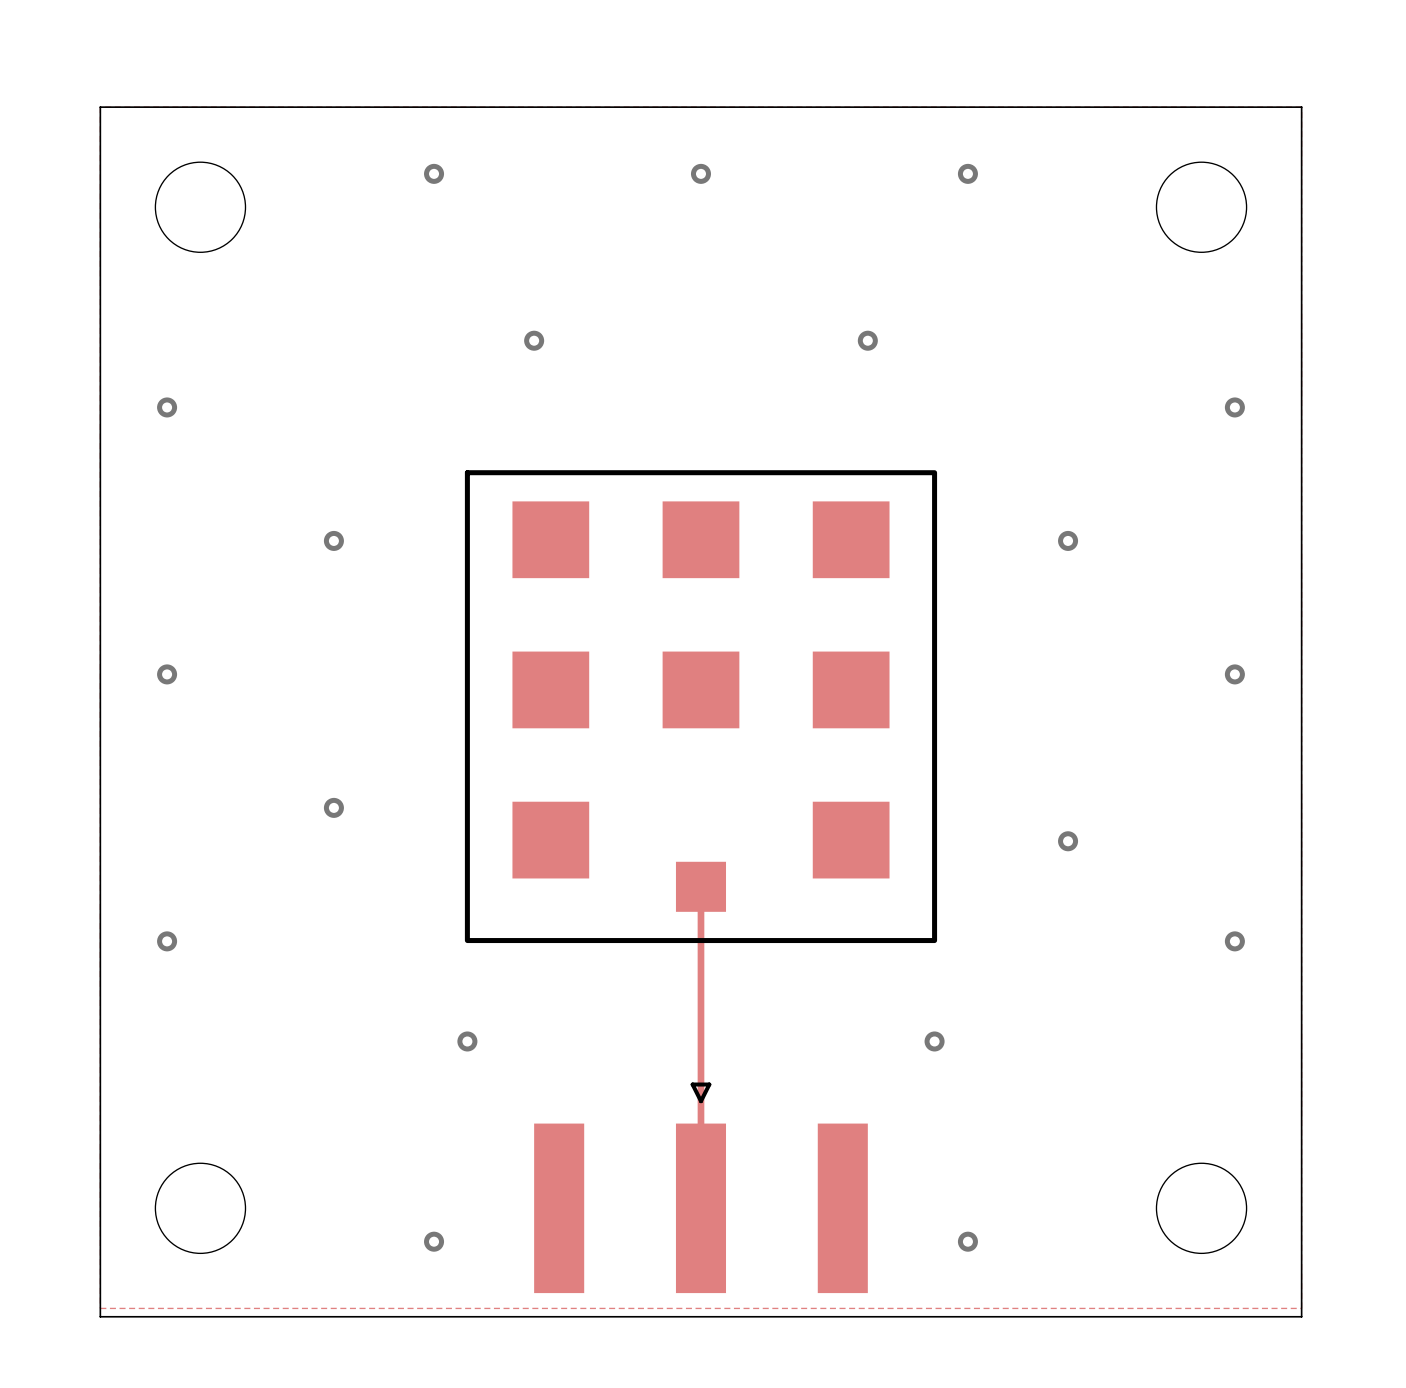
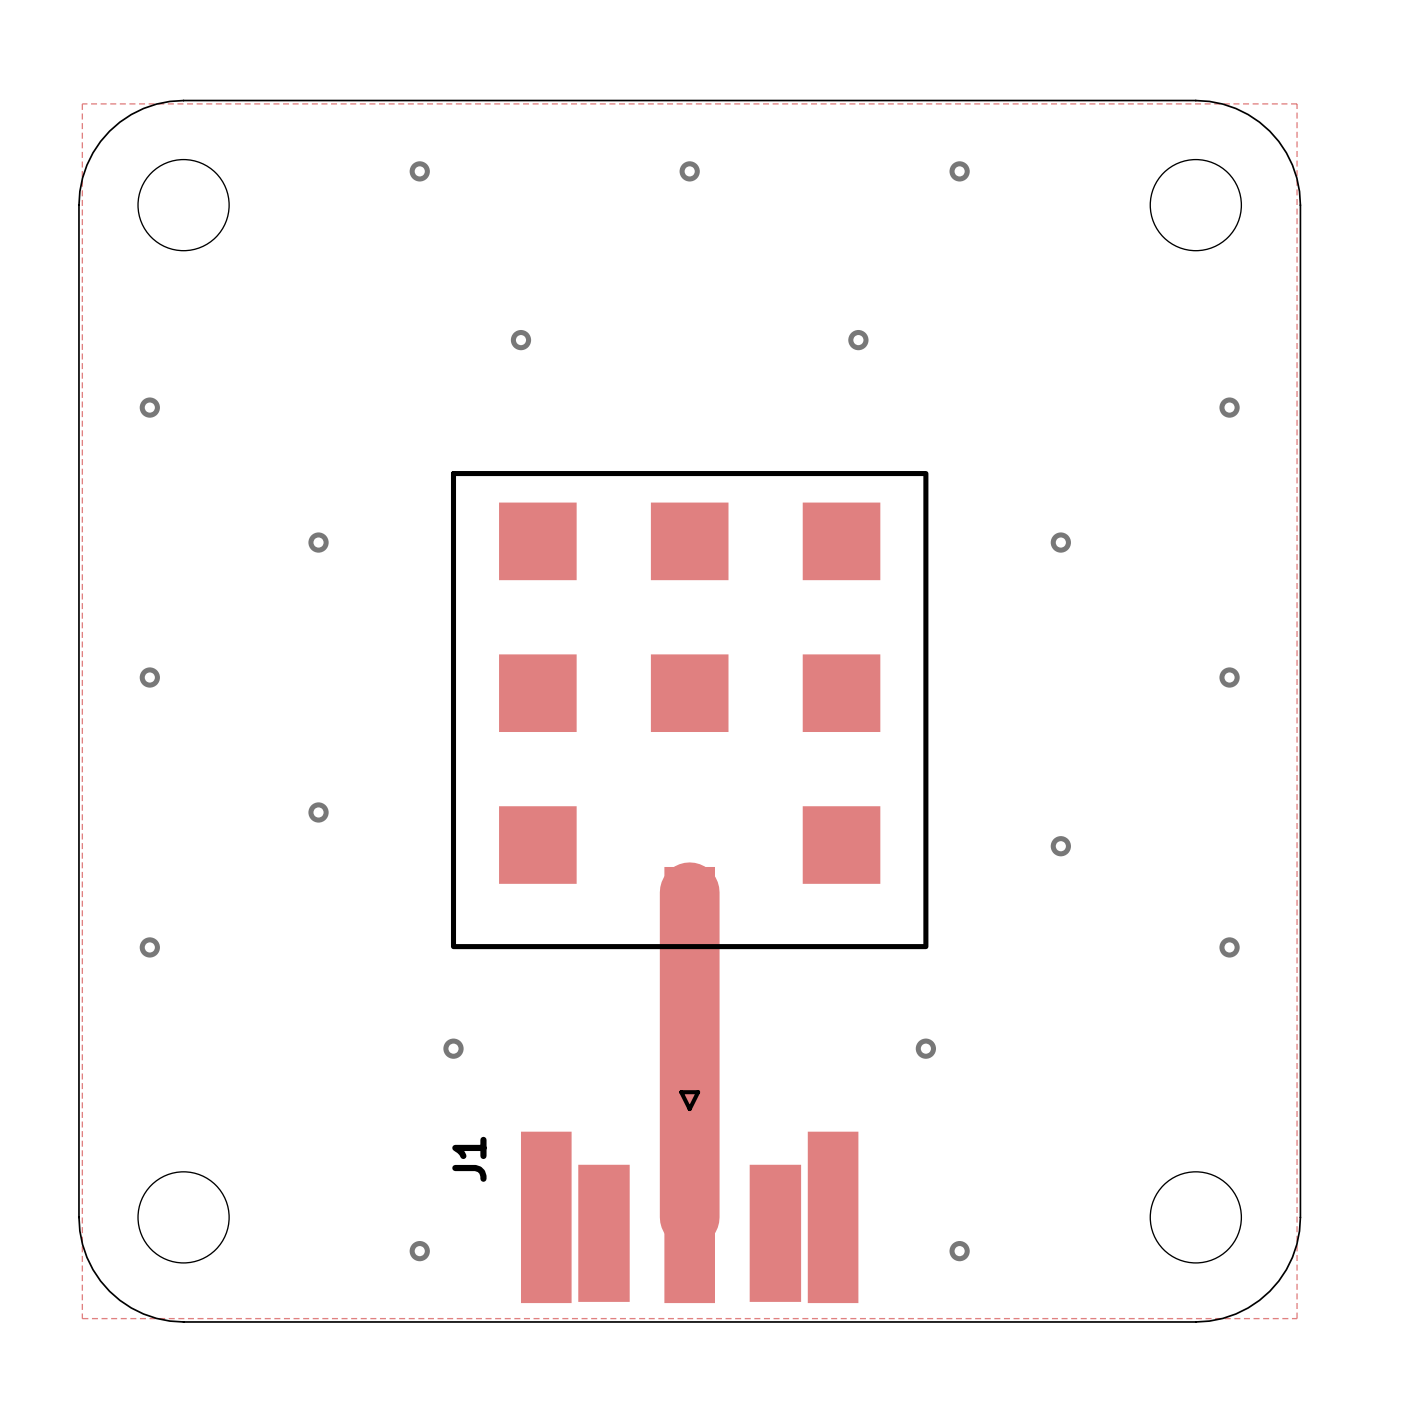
board edge: (100, 107) (1301, 107) (1301, 1316) (100, 1316) (100, 107) -> (183, 100) (169, 101) (143, 108) (131, 114) (109, 131) (100, 141) (86, 165) (82, 178) (78, 205) (78, 1217) (82, 1244) (86, 1257) (100, 1281) (109, 1291) (119, 1300) (143, 1314) (169, 1321) (183, 1321) (1195, 1321) (1222, 1318) (1235, 1314) (1259, 1300) (1269, 1291) (1278, 1281) (1292, 1257) (1296, 1244) (1300, 1217) (1300, 205) (1299, 191) (1292, 165) (1286, 152) (1269, 131) (1248, 114) (1235, 108) (1209, 101) (1195, 100) (183, 100)
track width: thin (700, 886) (700, 1208) -> thick (689, 892) (689, 1217)
J1: none -> (689, 1233)

